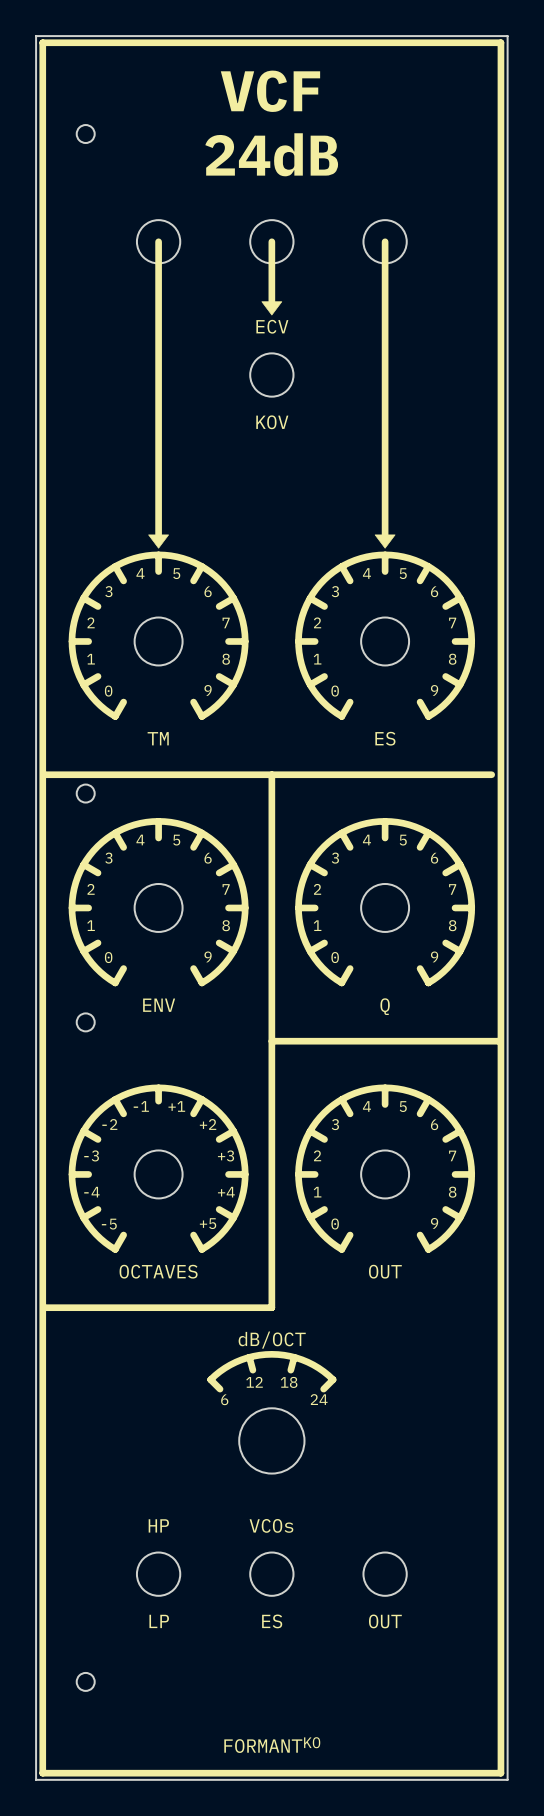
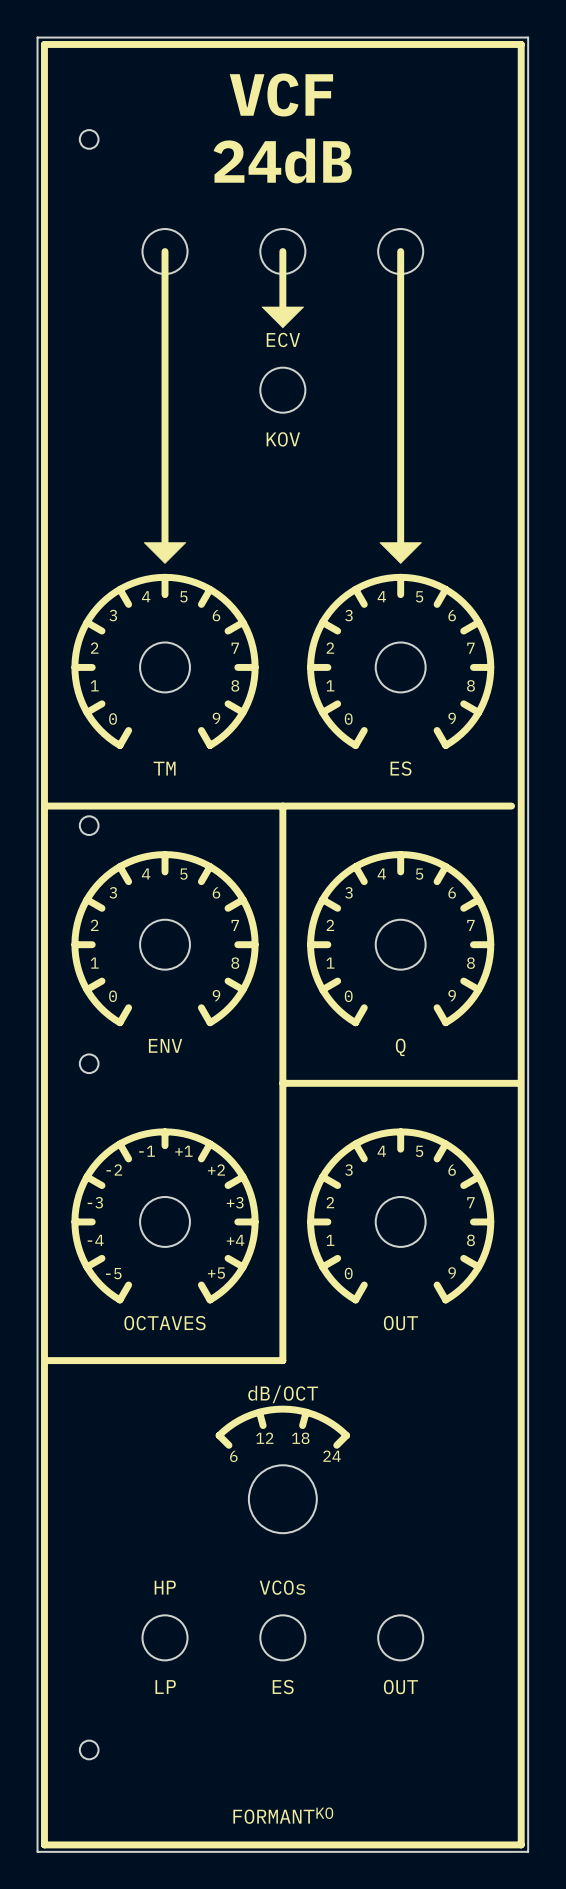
drawing shape: [261, 301, 283, 316] -> [261, 306, 304, 329]
drawing: none -> [143, 542, 187, 564]
drawing: none -> [379, 542, 422, 564]
drawing: [148, 534, 169, 549] -> none
drawing: [374, 534, 396, 549] -> none

